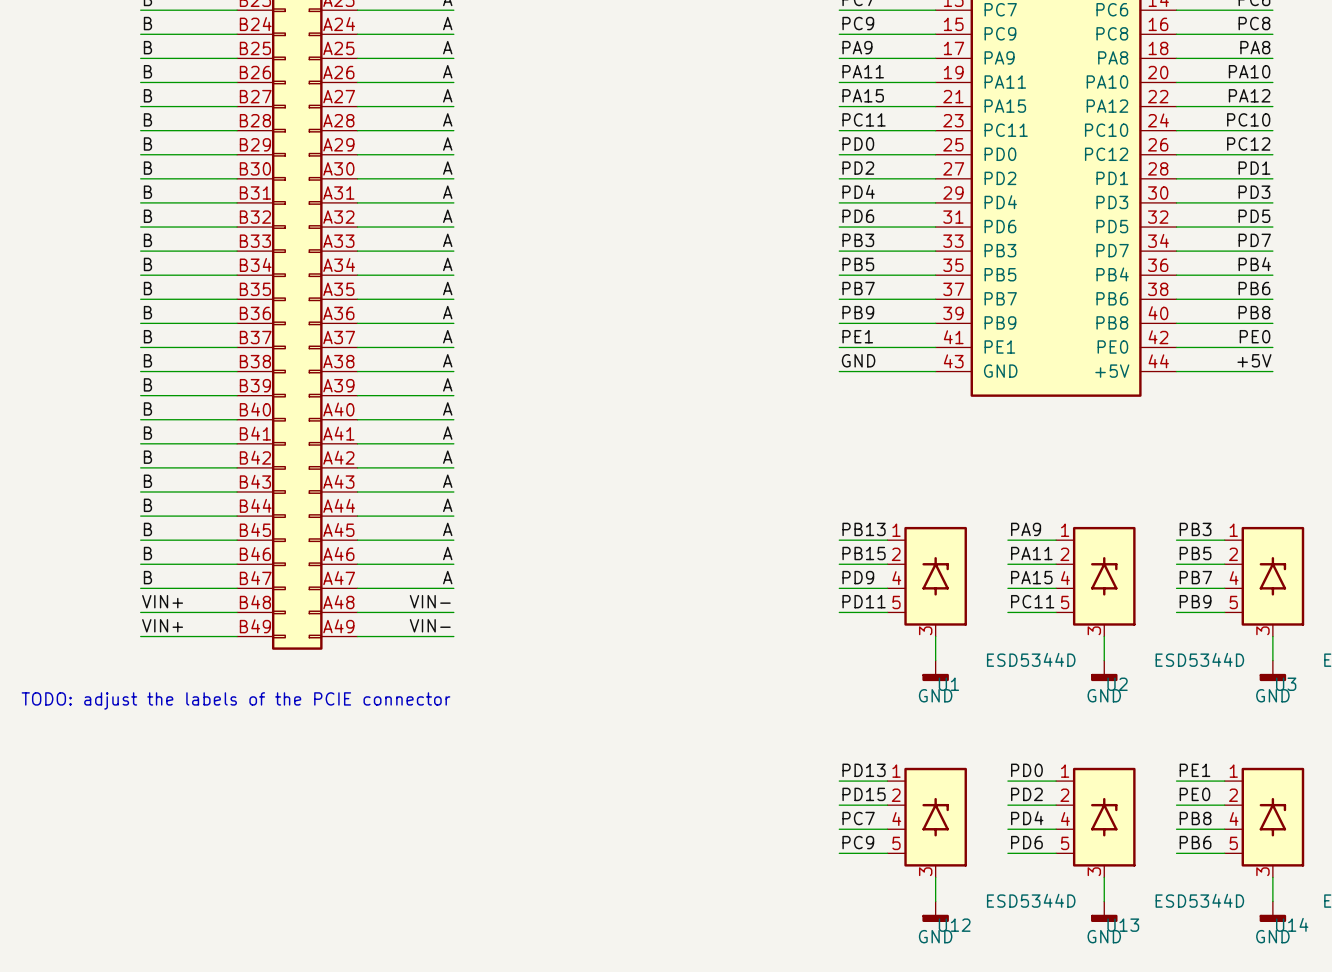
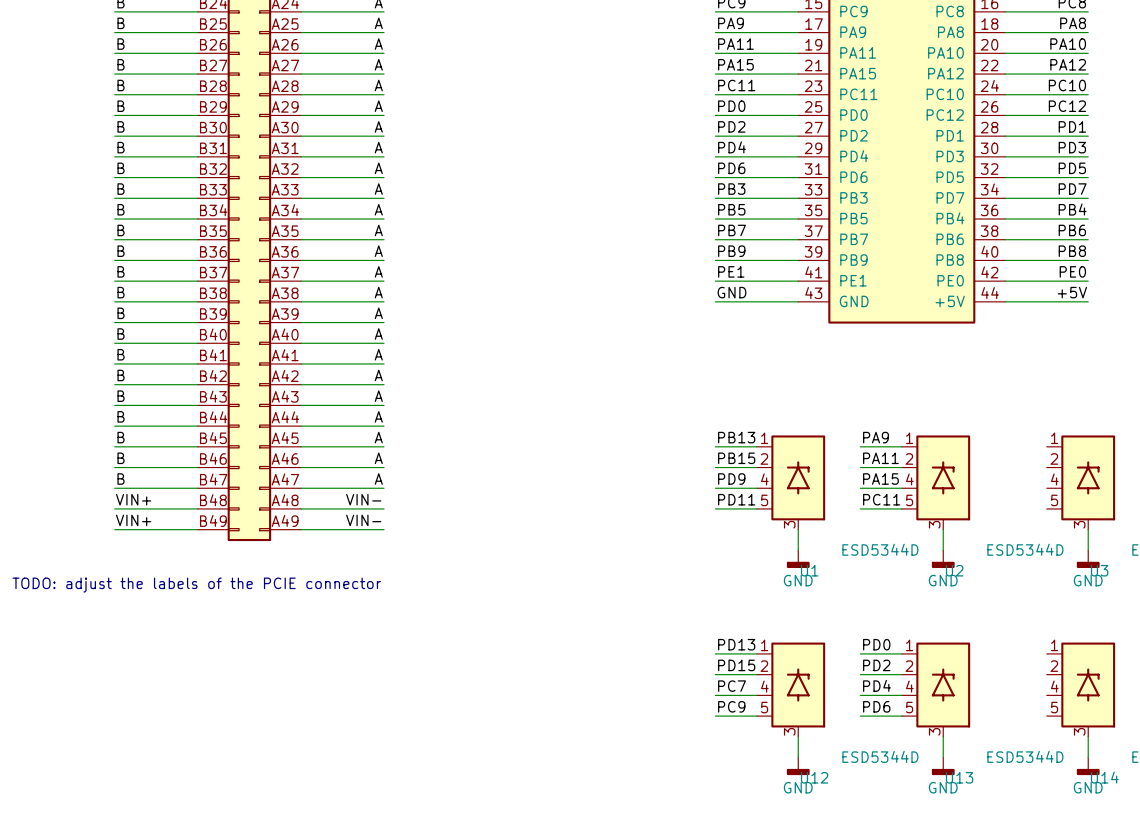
label: PB3 (1195, 529) -> none
wire: (1176, 540) (1224, 540) -> none
label: PB5 (1195, 553) -> none
wire: (1176, 564) (1224, 564) -> none
label: PB7 (1195, 577) -> none
wire: (1176, 588) (1224, 588) -> none
label: PB9 (1195, 601) -> none
wire: (1176, 612) (1224, 612) -> none
label: PE1 (1194, 770) -> none
wire: (1176, 781) (1224, 781) -> none
label: PE0 (1194, 794) -> none
wire: (1176, 805) (1224, 805) -> none
label: PB8 (1195, 818) -> none
wire: (1176, 829) (1224, 829) -> none
label: PB6 (1195, 842) -> none
wire: (1176, 853) (1224, 853) -> none

